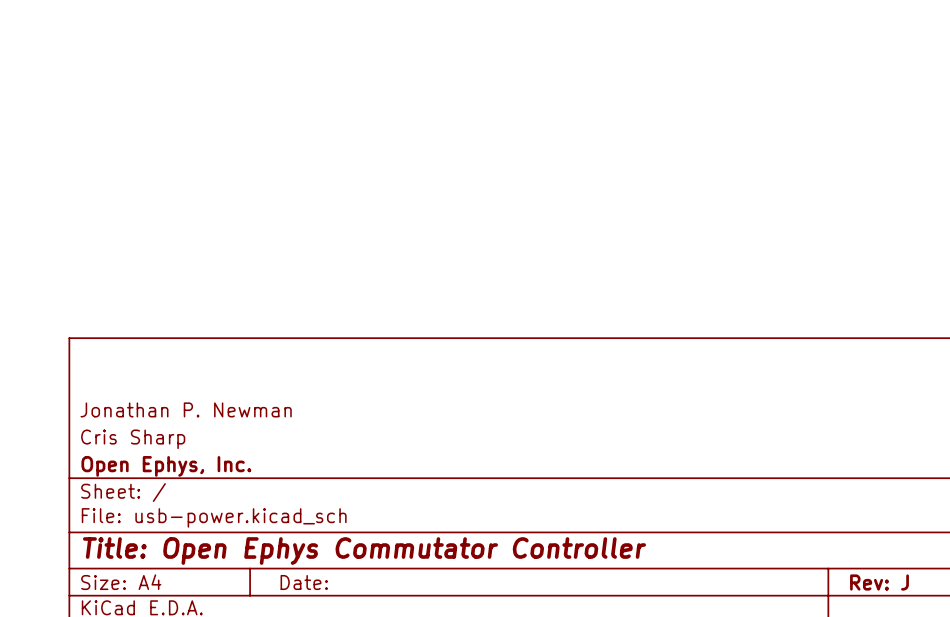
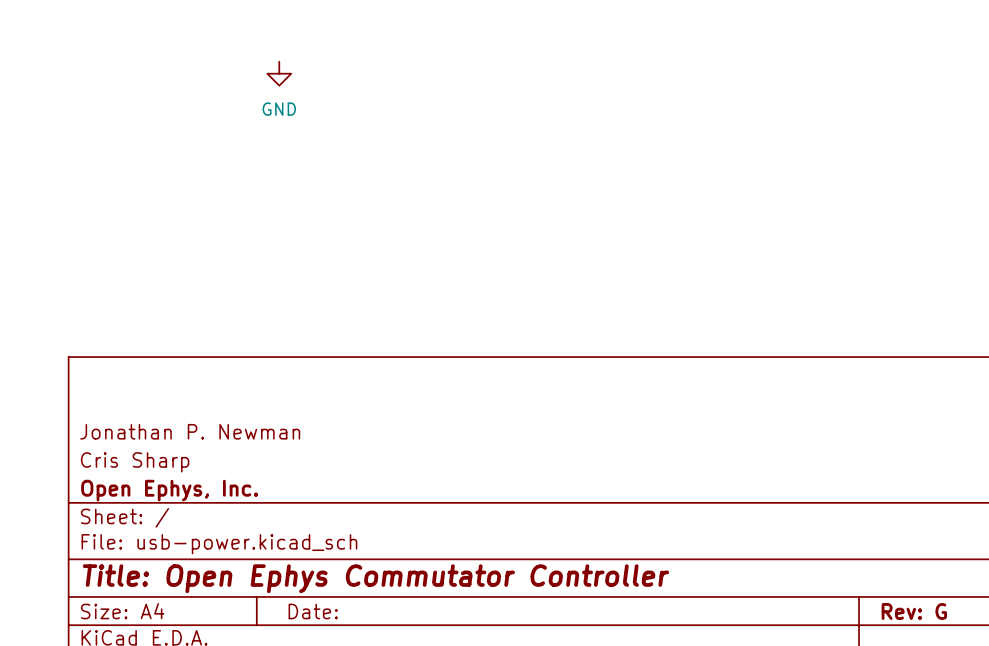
power symbol: none -> GND (279, 73)
title block: Rev: J (879, 582) -> Rev: G (914, 611)

